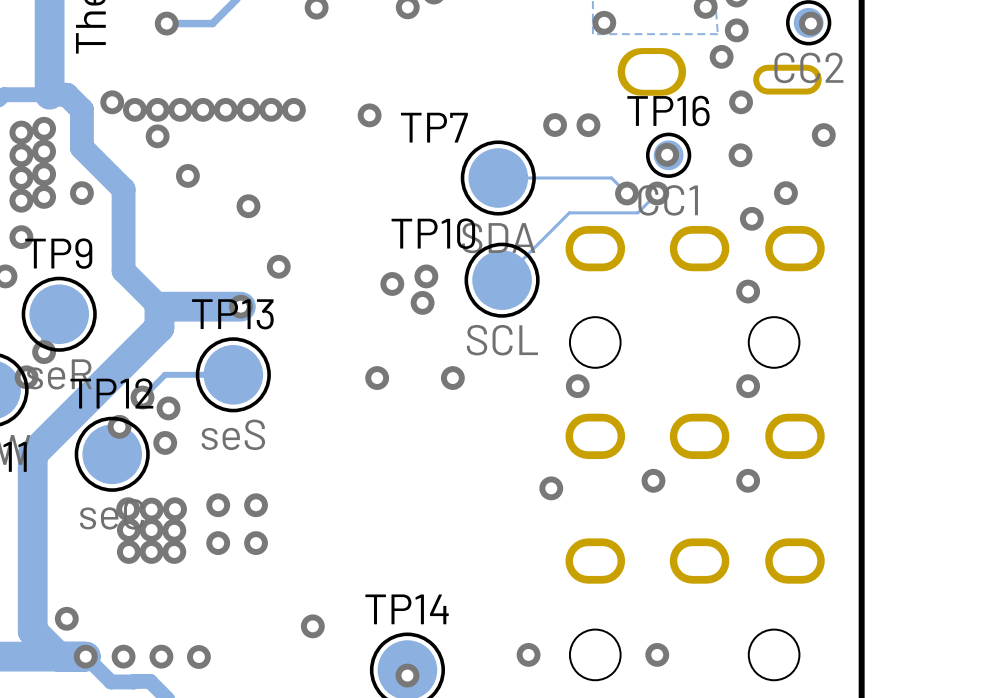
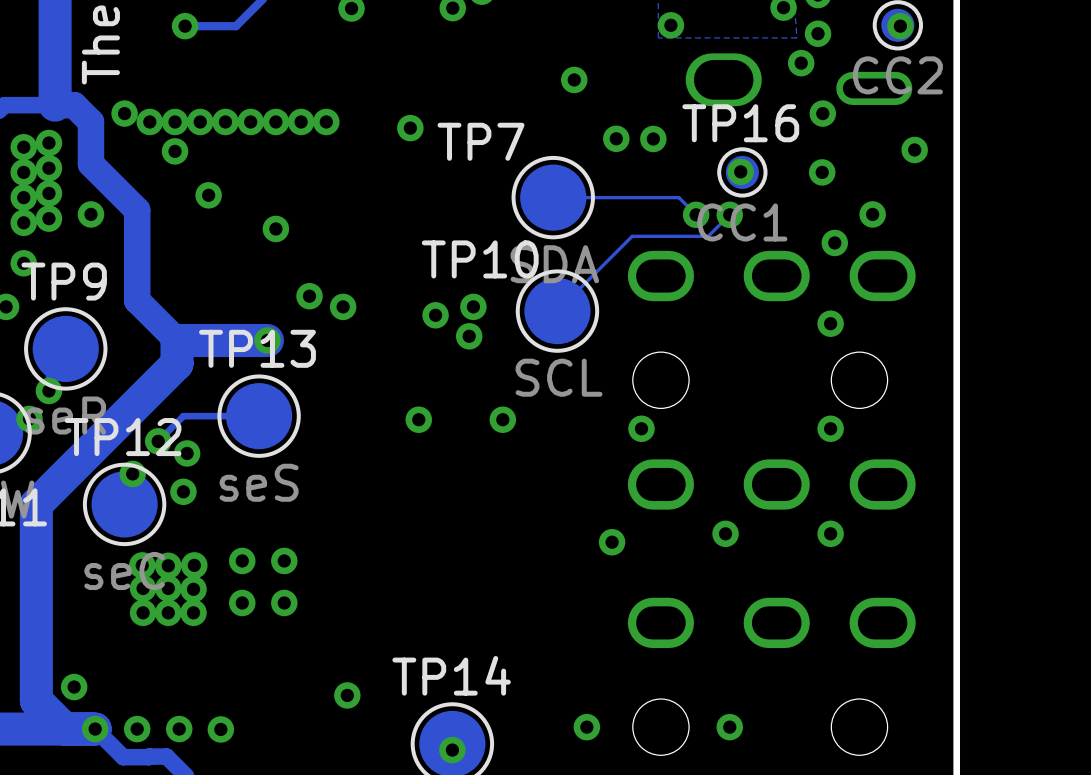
via: none -> (574, 79)
via: none -> (343, 306)

